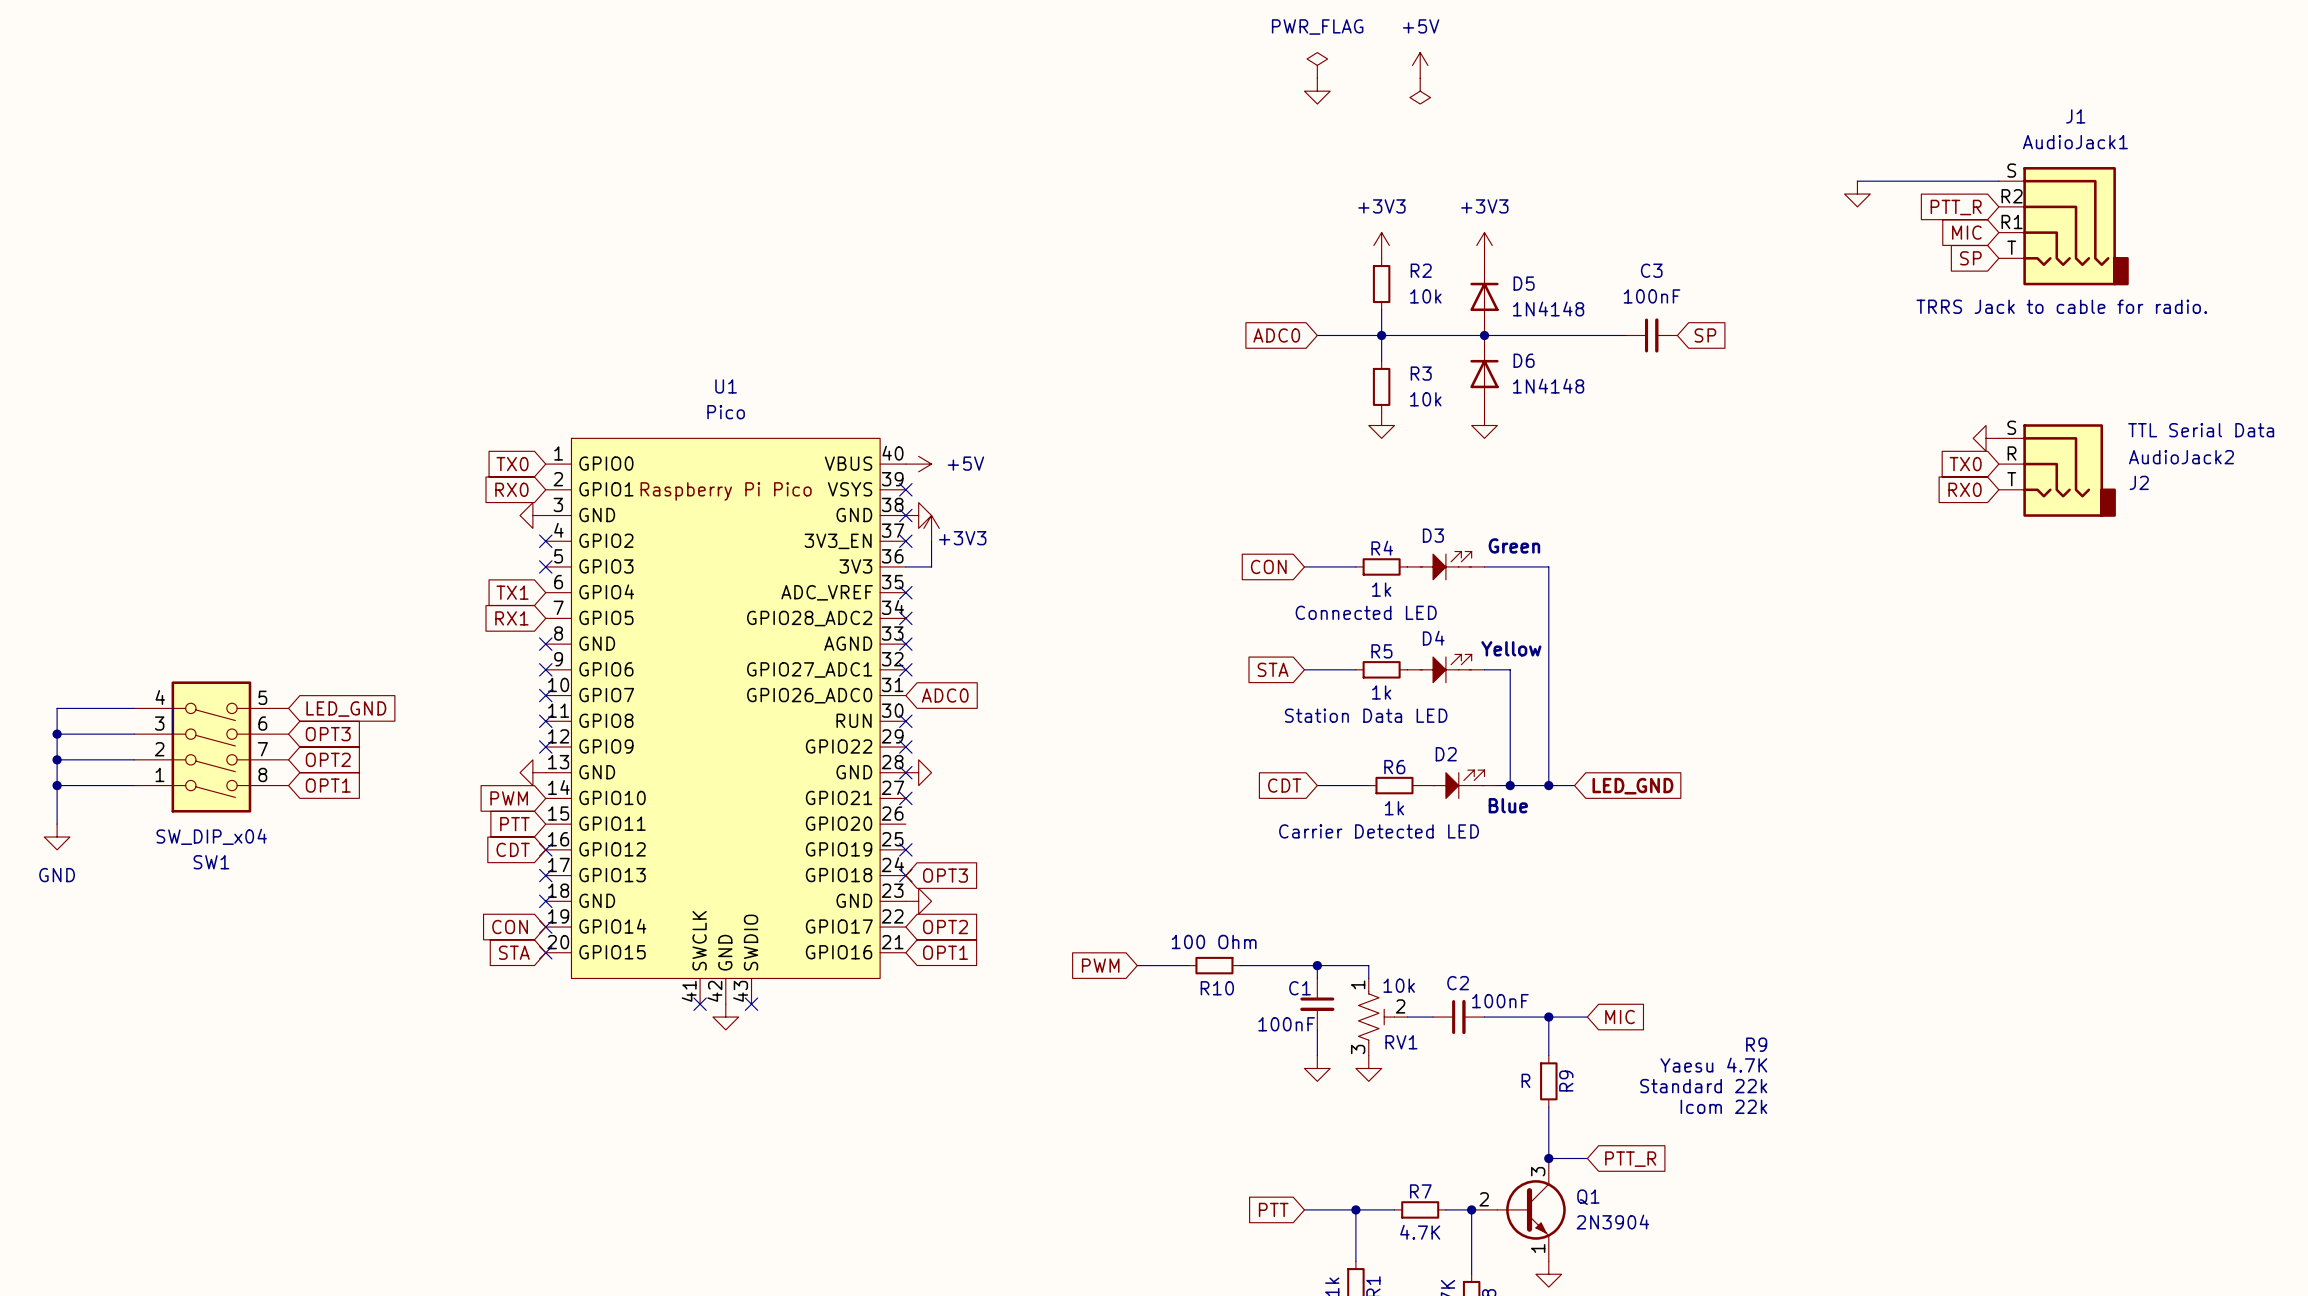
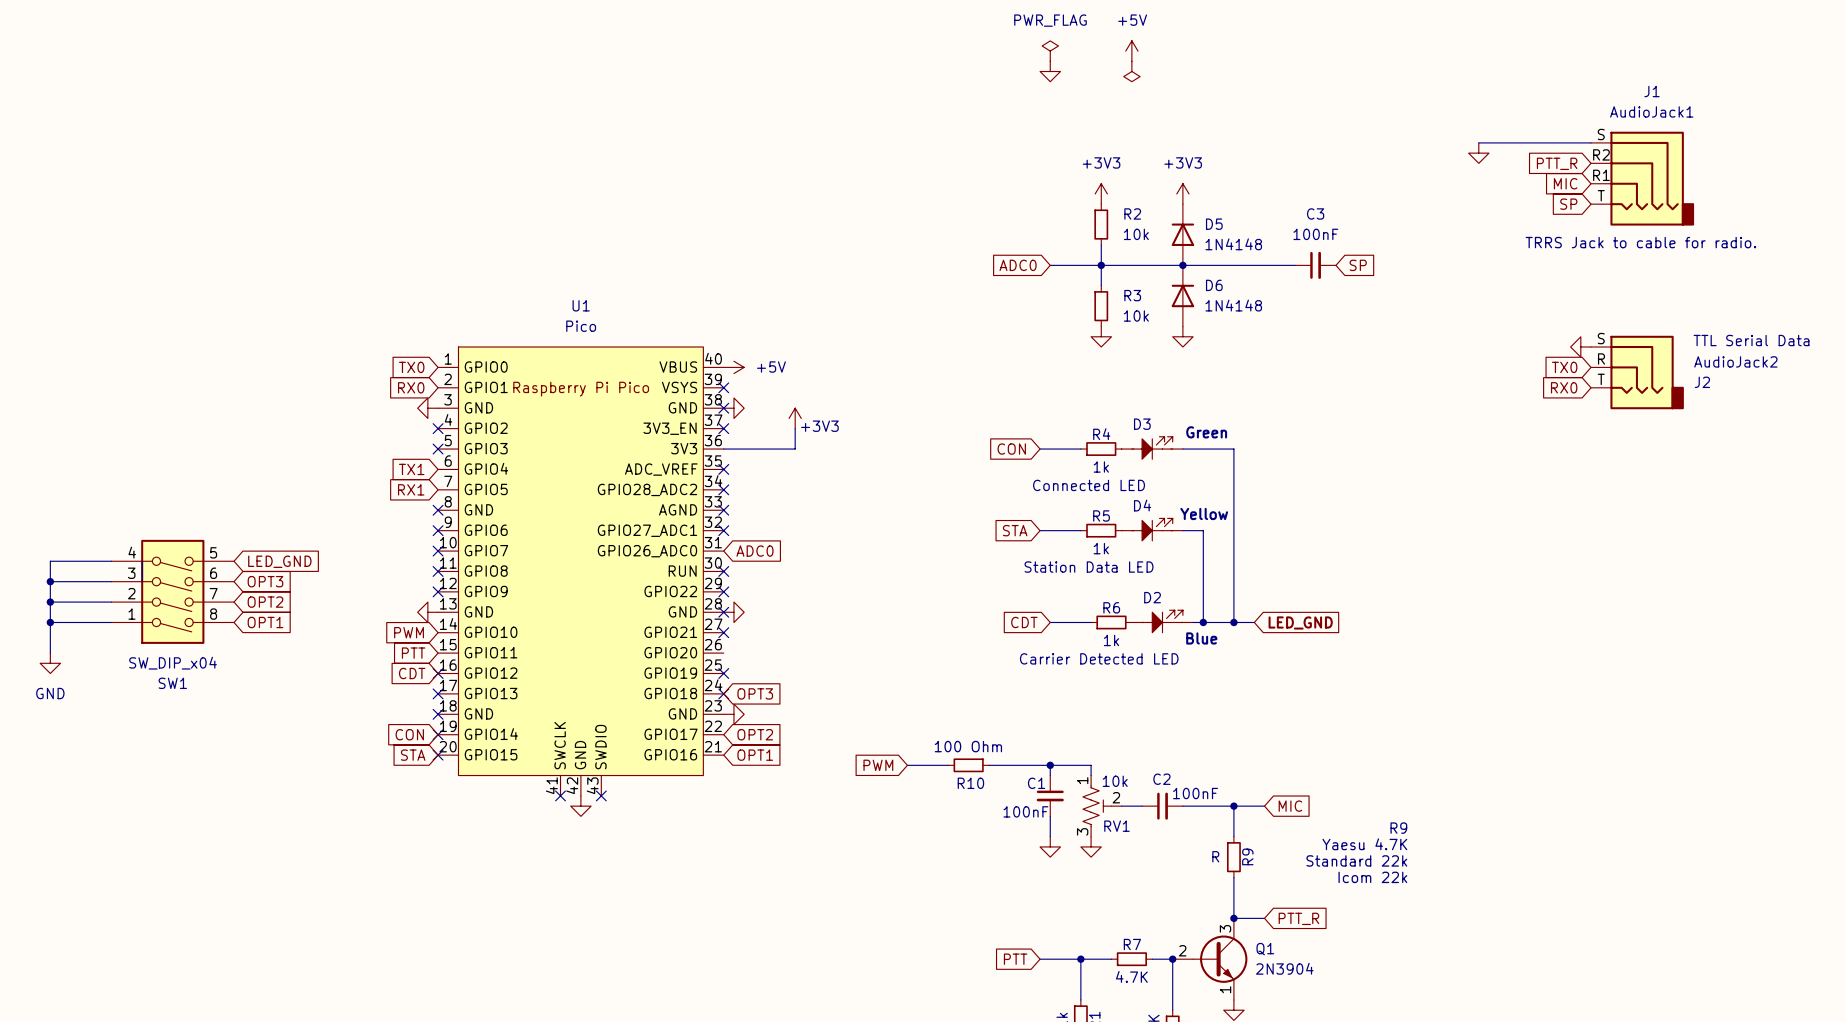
power symbol position: +3V3 (931, 528) -> +3V3 (795, 418)
wire: (931, 541) (931, 566) -> (795, 428) (795, 449) (744, 449)

